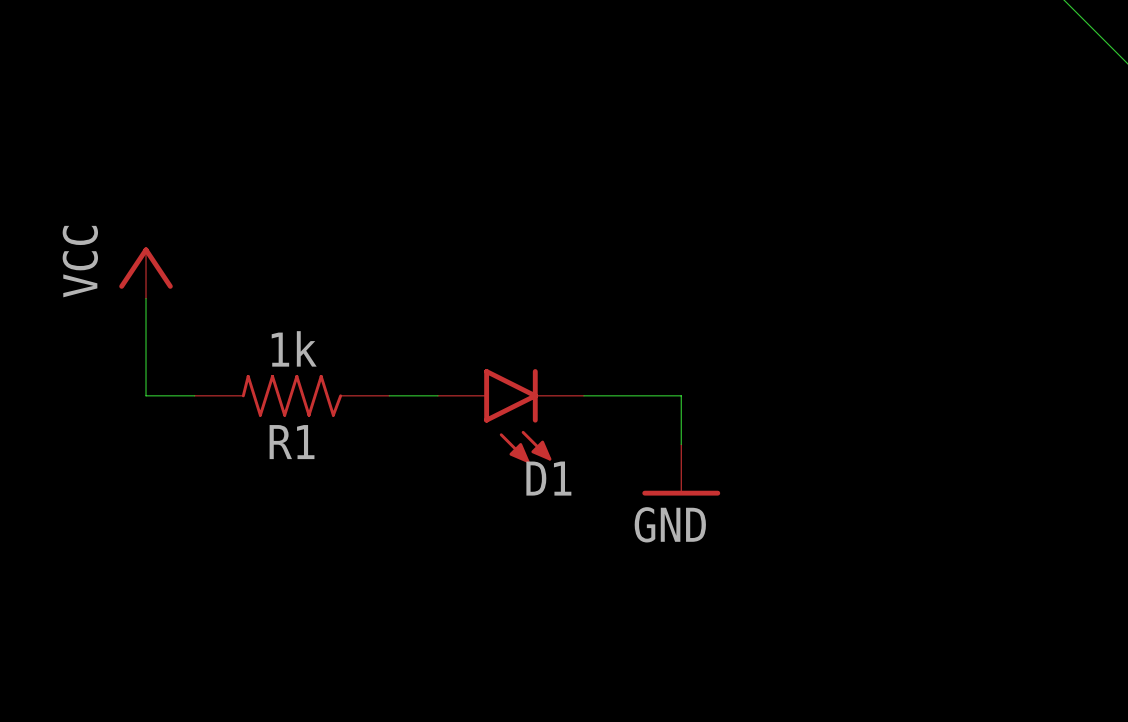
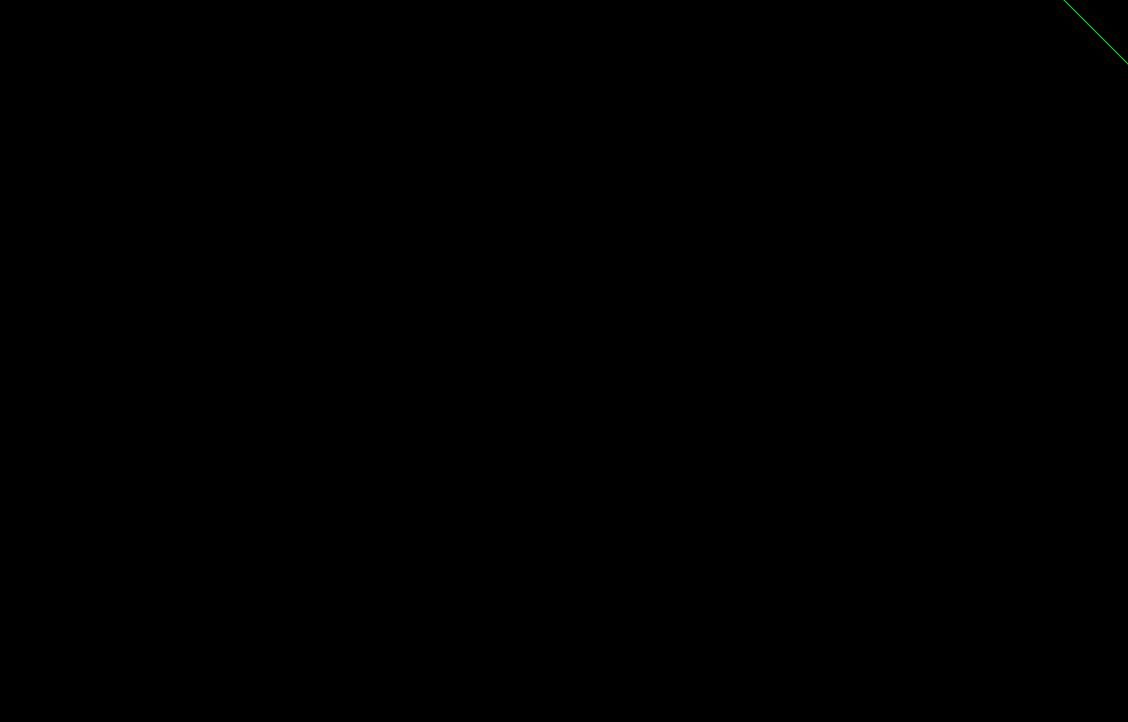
power symbol: VCC (146, 272) -> none
wire: (146, 298) (146, 395) (194, 395) -> none
R1: 1k (291, 395) -> none
wire: (389, 395) (437, 395) -> none
wire: (583, 395) (681, 395) (681, 444) -> none
D1: (510, 416) -> none
power symbol: GND (681, 470) -> none

